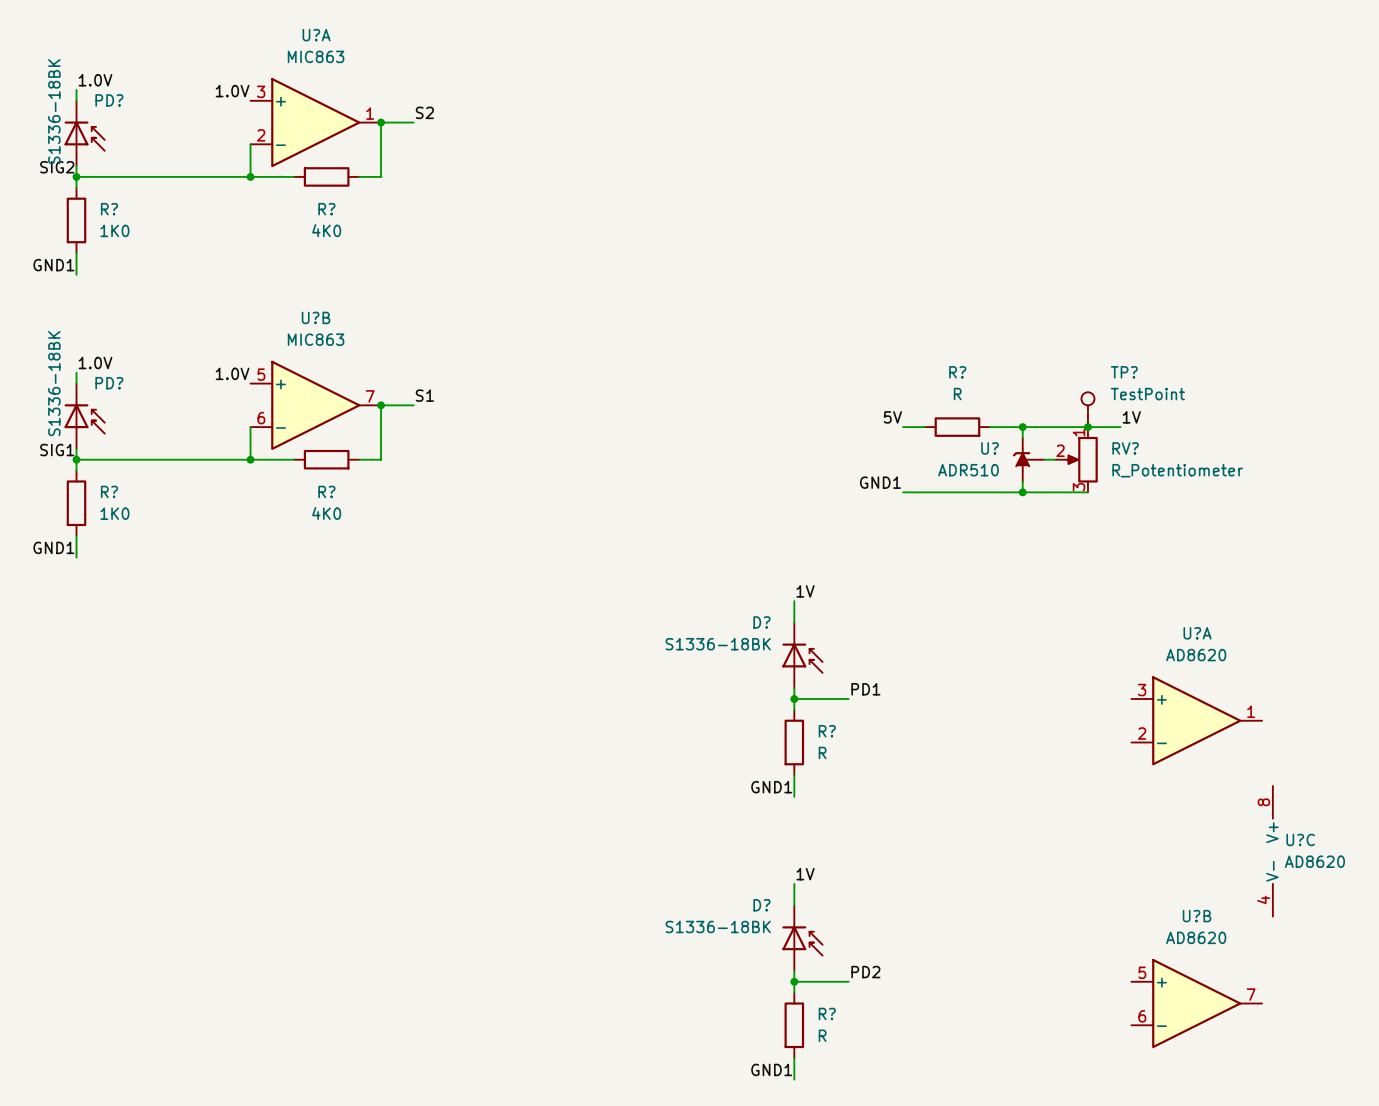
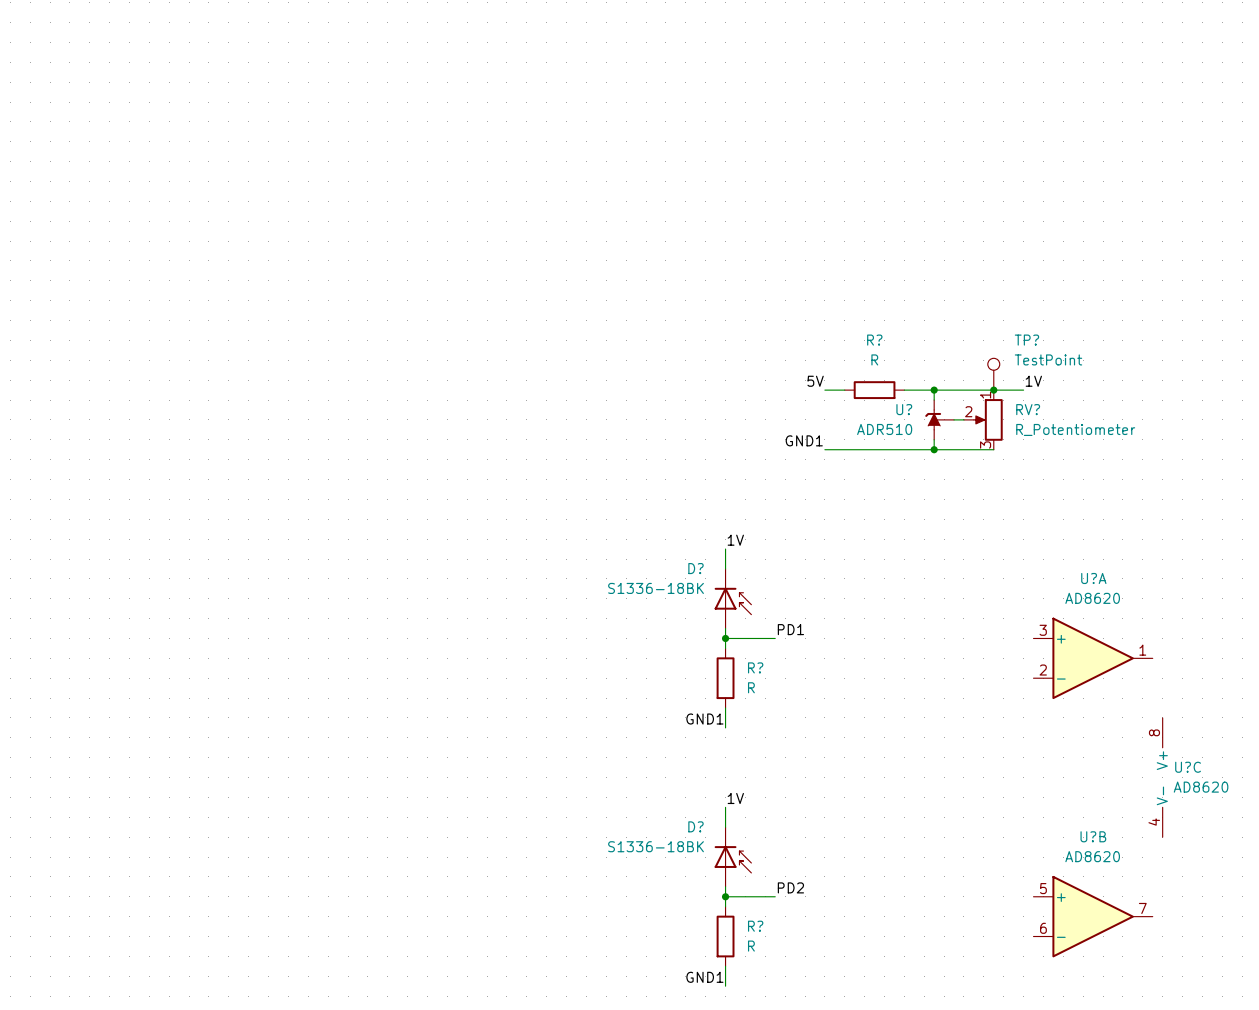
label: 1.0V (95, 80) -> none
wire: (76, 89) (76, 100) -> none
label: 1.0V (232, 91) -> none
label: S2 (424, 112) -> none
U?A: MIC863 (315, 122) -> none
junction: (381, 122) -> none
wire: (413, 122) (381, 122) (381, 176) (359, 176) -> none
PD?: S1336-18BK (84, 133) -> none
wire: (250, 144) (250, 176) -> none
wire: (76, 166) (76, 187) -> none
label: SIG2 (57, 167) -> none
wire: (76, 176) (294, 176) -> none
junction: (76, 176) -> none
junction: (250, 176) -> none
R?: 4K0 (326, 176) -> none
R?: 1K0 (76, 220) -> none
wire: (76, 253) (76, 274) -> none
label: GND1 (53, 265) -> none
label: 1.0V (95, 363) -> none
wire: (76, 372) (76, 383) -> none
label: 1.0V (232, 373) -> none
label: S1 (424, 395) -> none
U?B: MIC863 (315, 405) -> none
junction: (381, 405) -> none
wire: (413, 405) (381, 405) (381, 459) (359, 459) -> none
PD?: S1336-18BK (84, 416) -> none
wire: (250, 427) (250, 459) -> none
wire: (76, 448) (76, 470) -> none
label: SIG1 (57, 450) -> none
wire: (76, 459) (294, 459) -> none
junction: (76, 459) -> none
junction: (250, 459) -> none
R?: 4K0 (326, 459) -> none
R?: 1K0 (76, 503) -> none
wire: (76, 535) (76, 557) -> none
label: GND1 (53, 547) -> none

